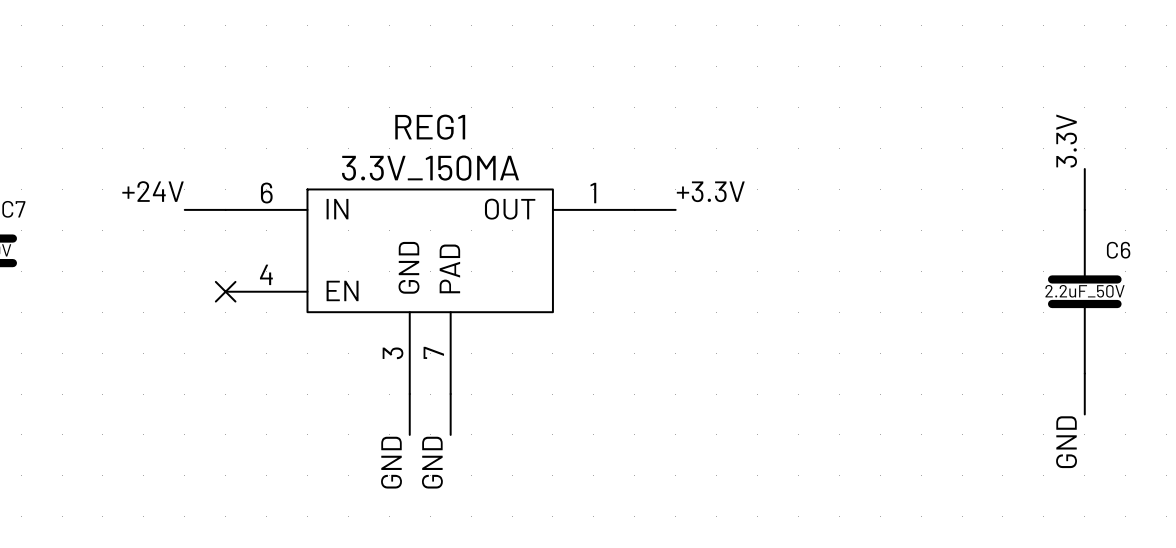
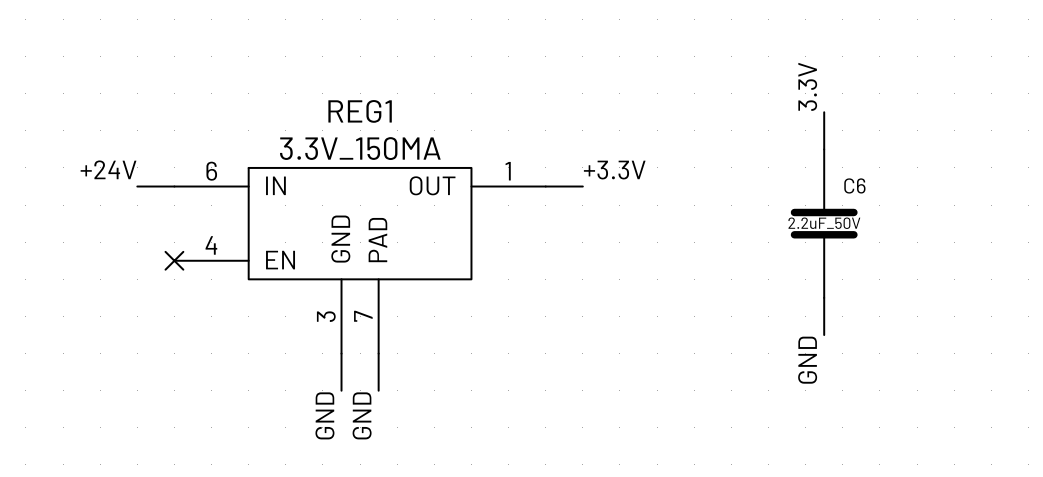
label position: 3.3V (1066, 141) -> 3.3V (807, 86)
wire: (1084, 169) (1084, 209) -> (824, 112) (824, 149)
C6 position: (1084, 291) -> (824, 223)
wire: (1084, 373) (1084, 414) -> (824, 297) (824, 335)
label position: GND (1066, 442) -> GND (807, 360)

